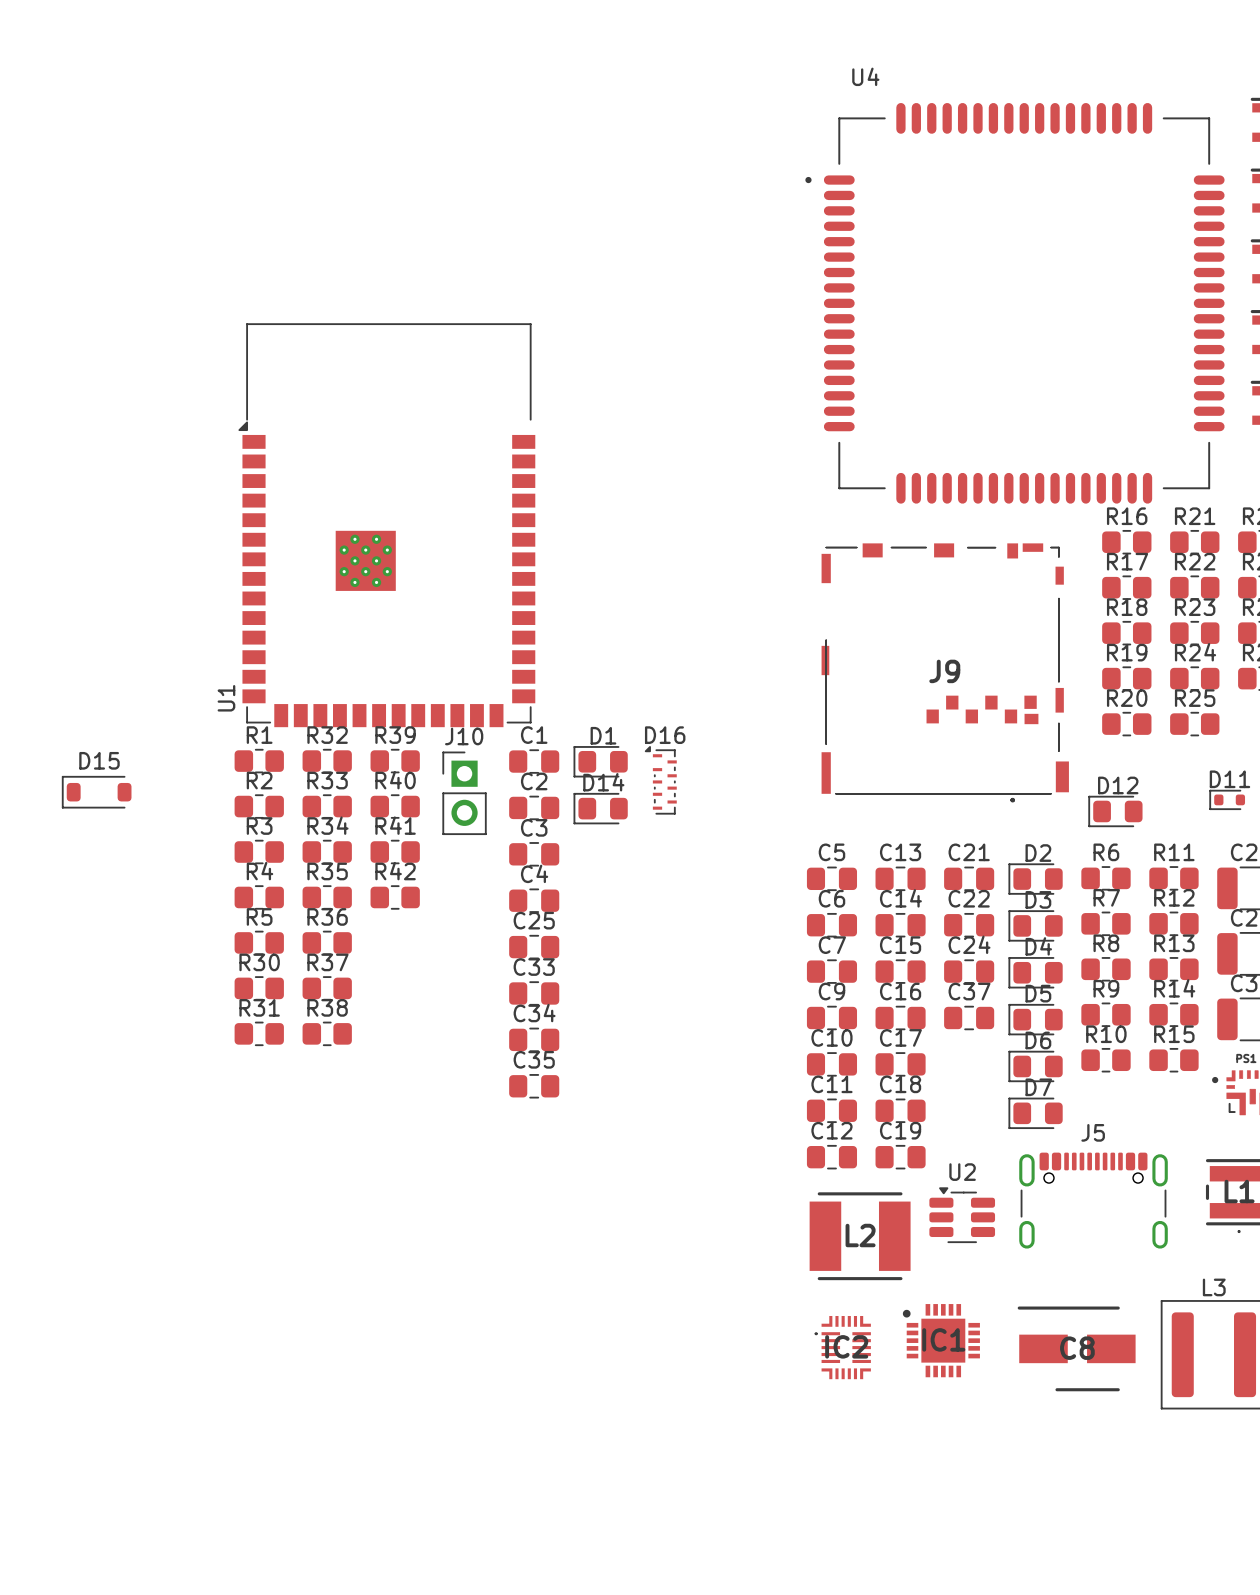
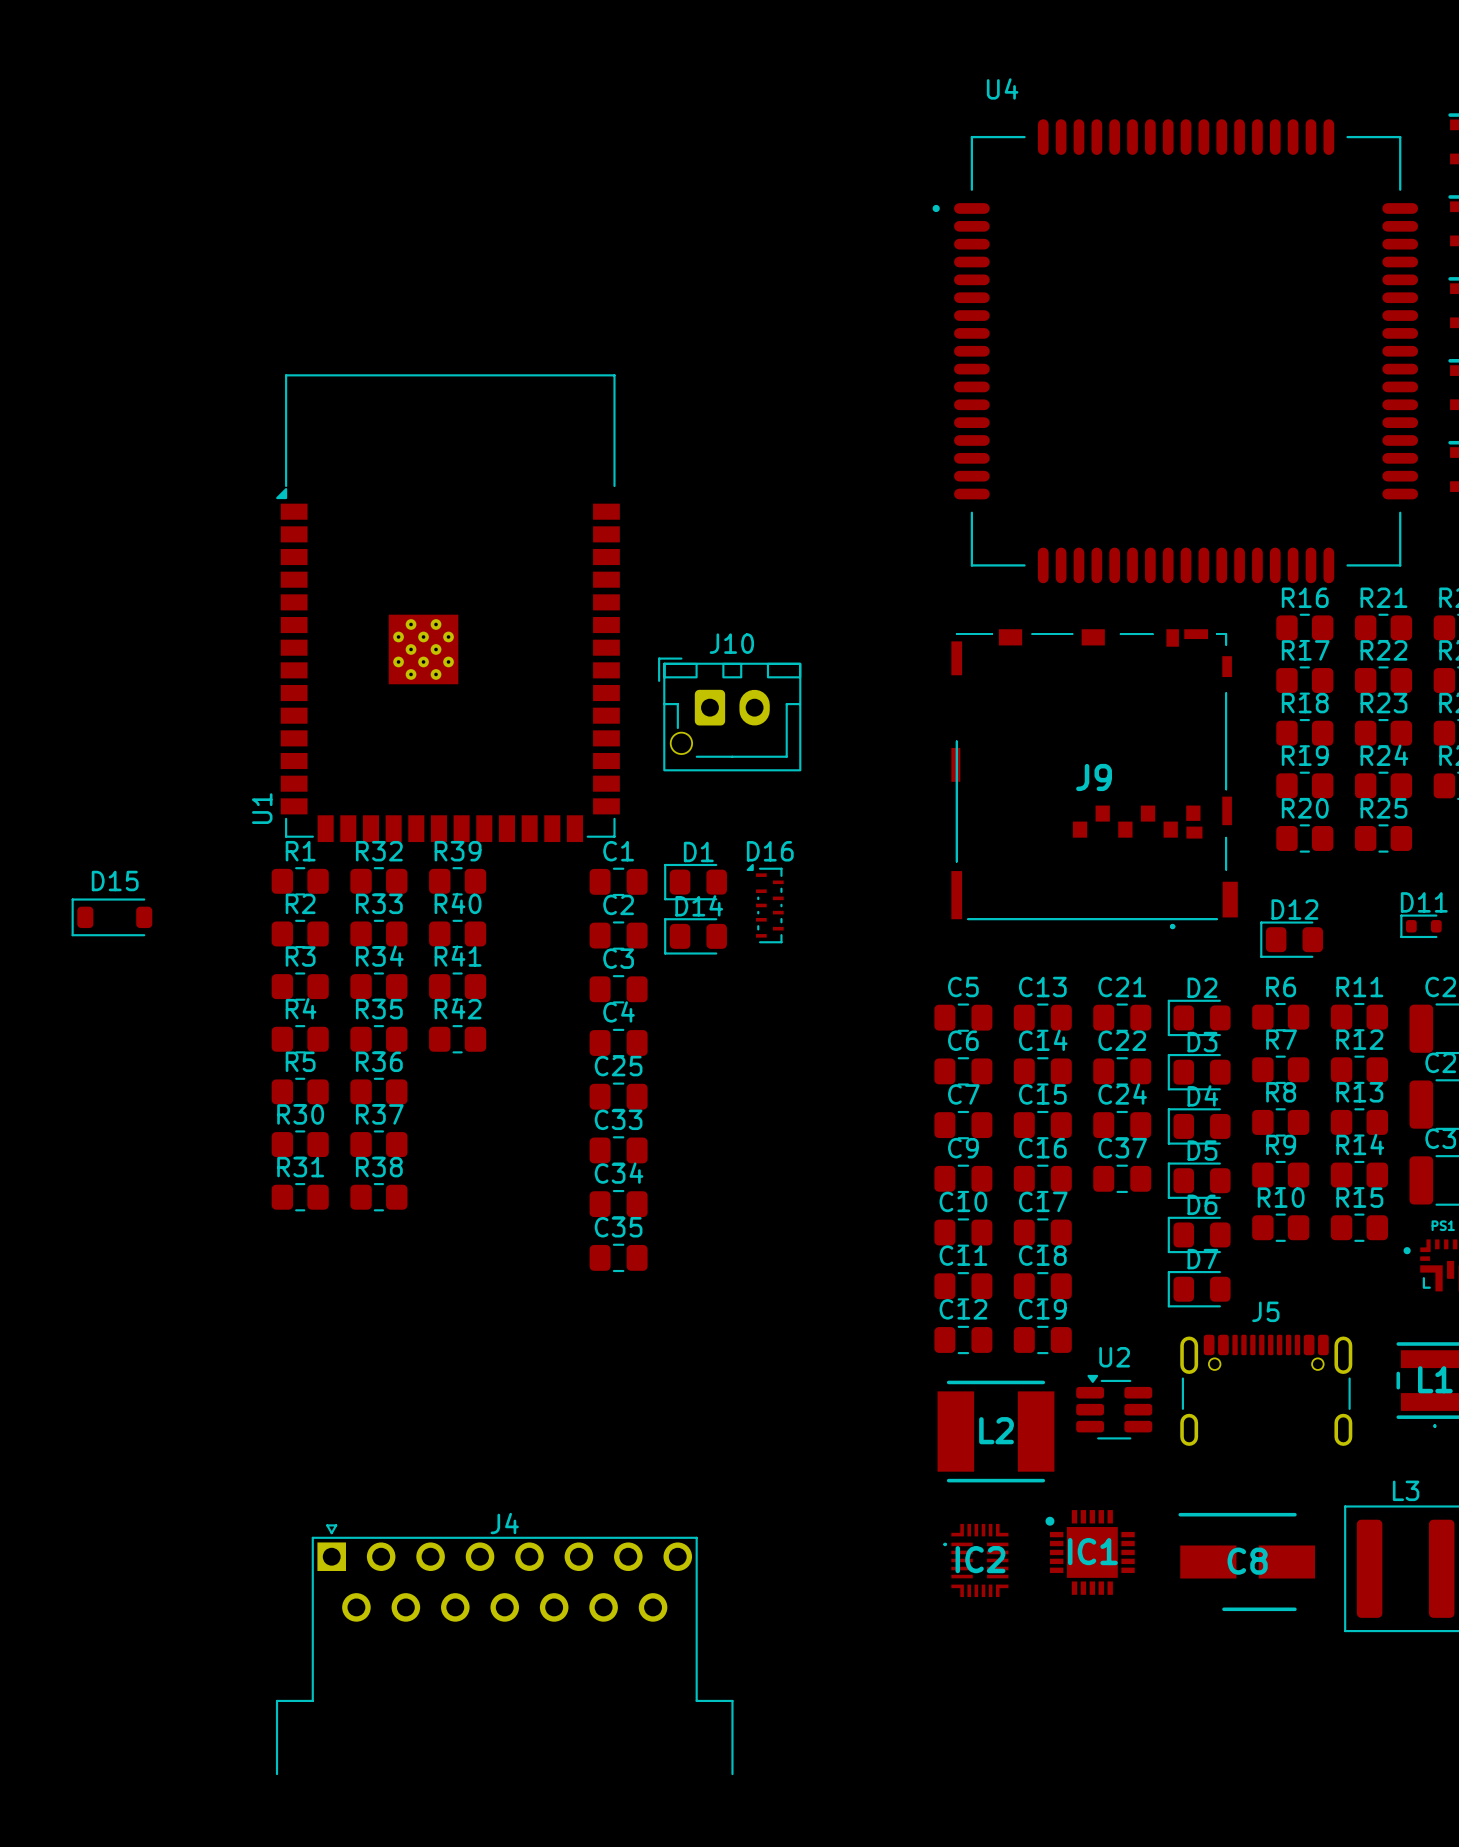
J10 footprint: [442, 751, 487, 836] -> [658, 657, 802, 772]
J4: none -> (504, 1649)

